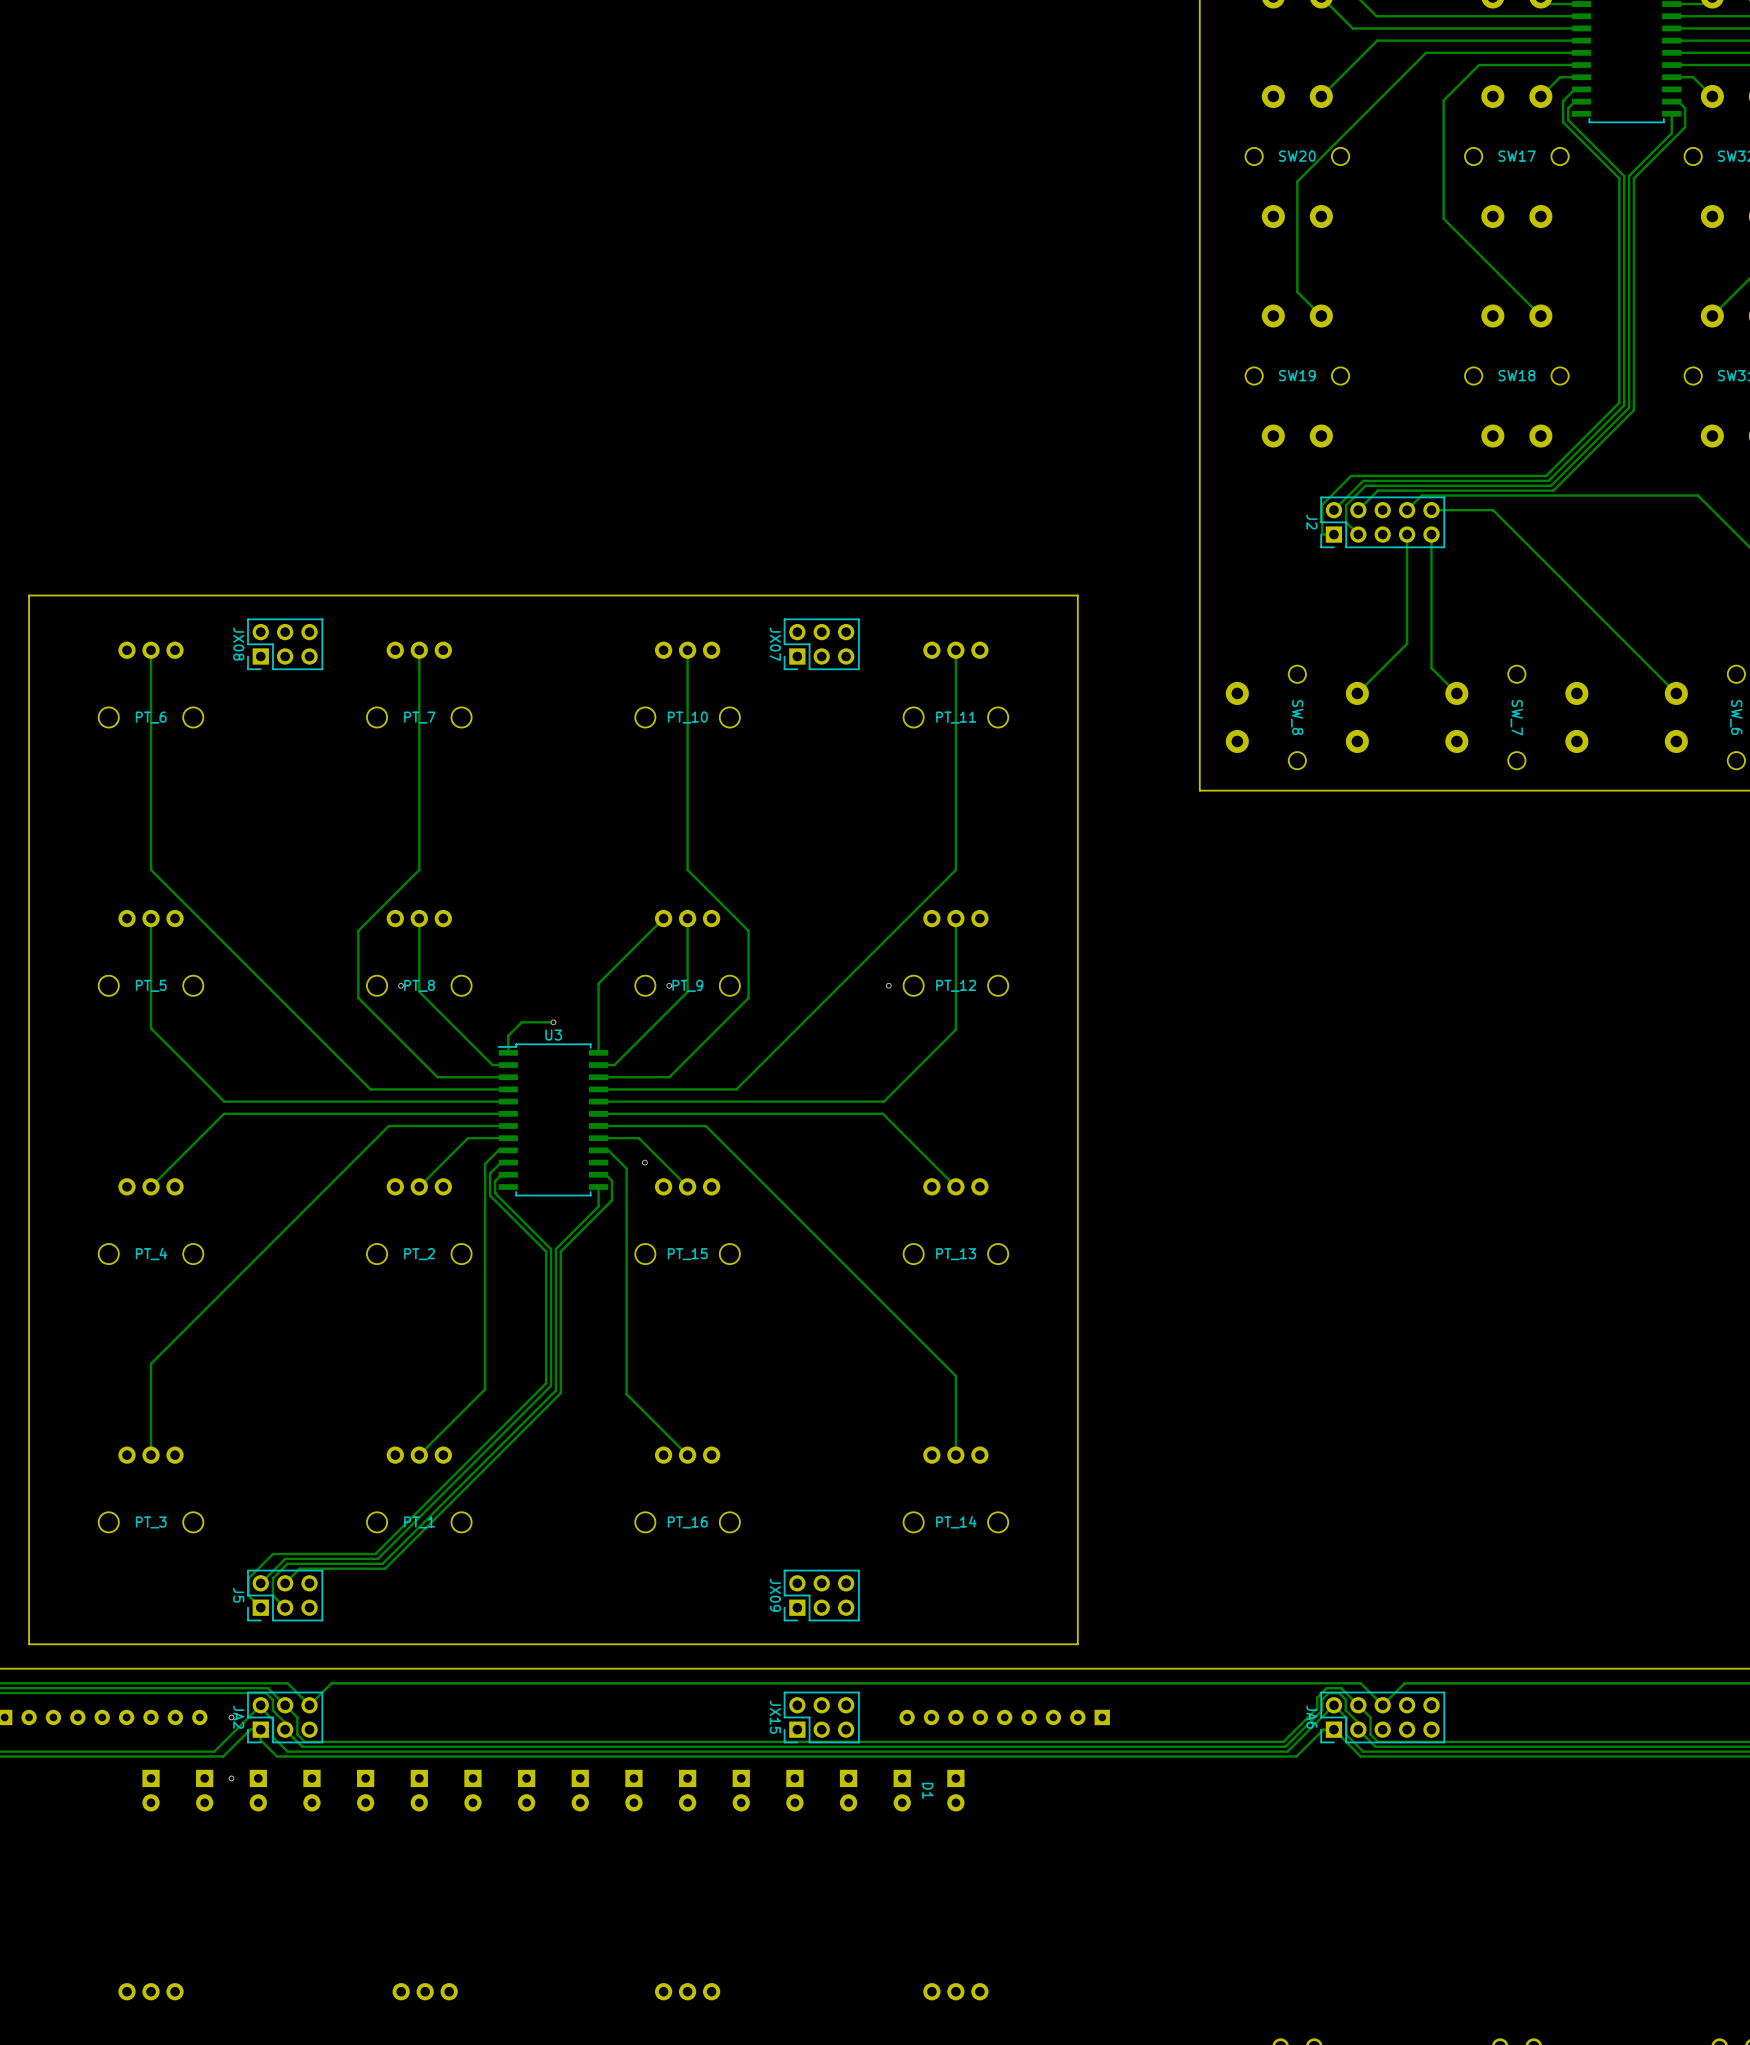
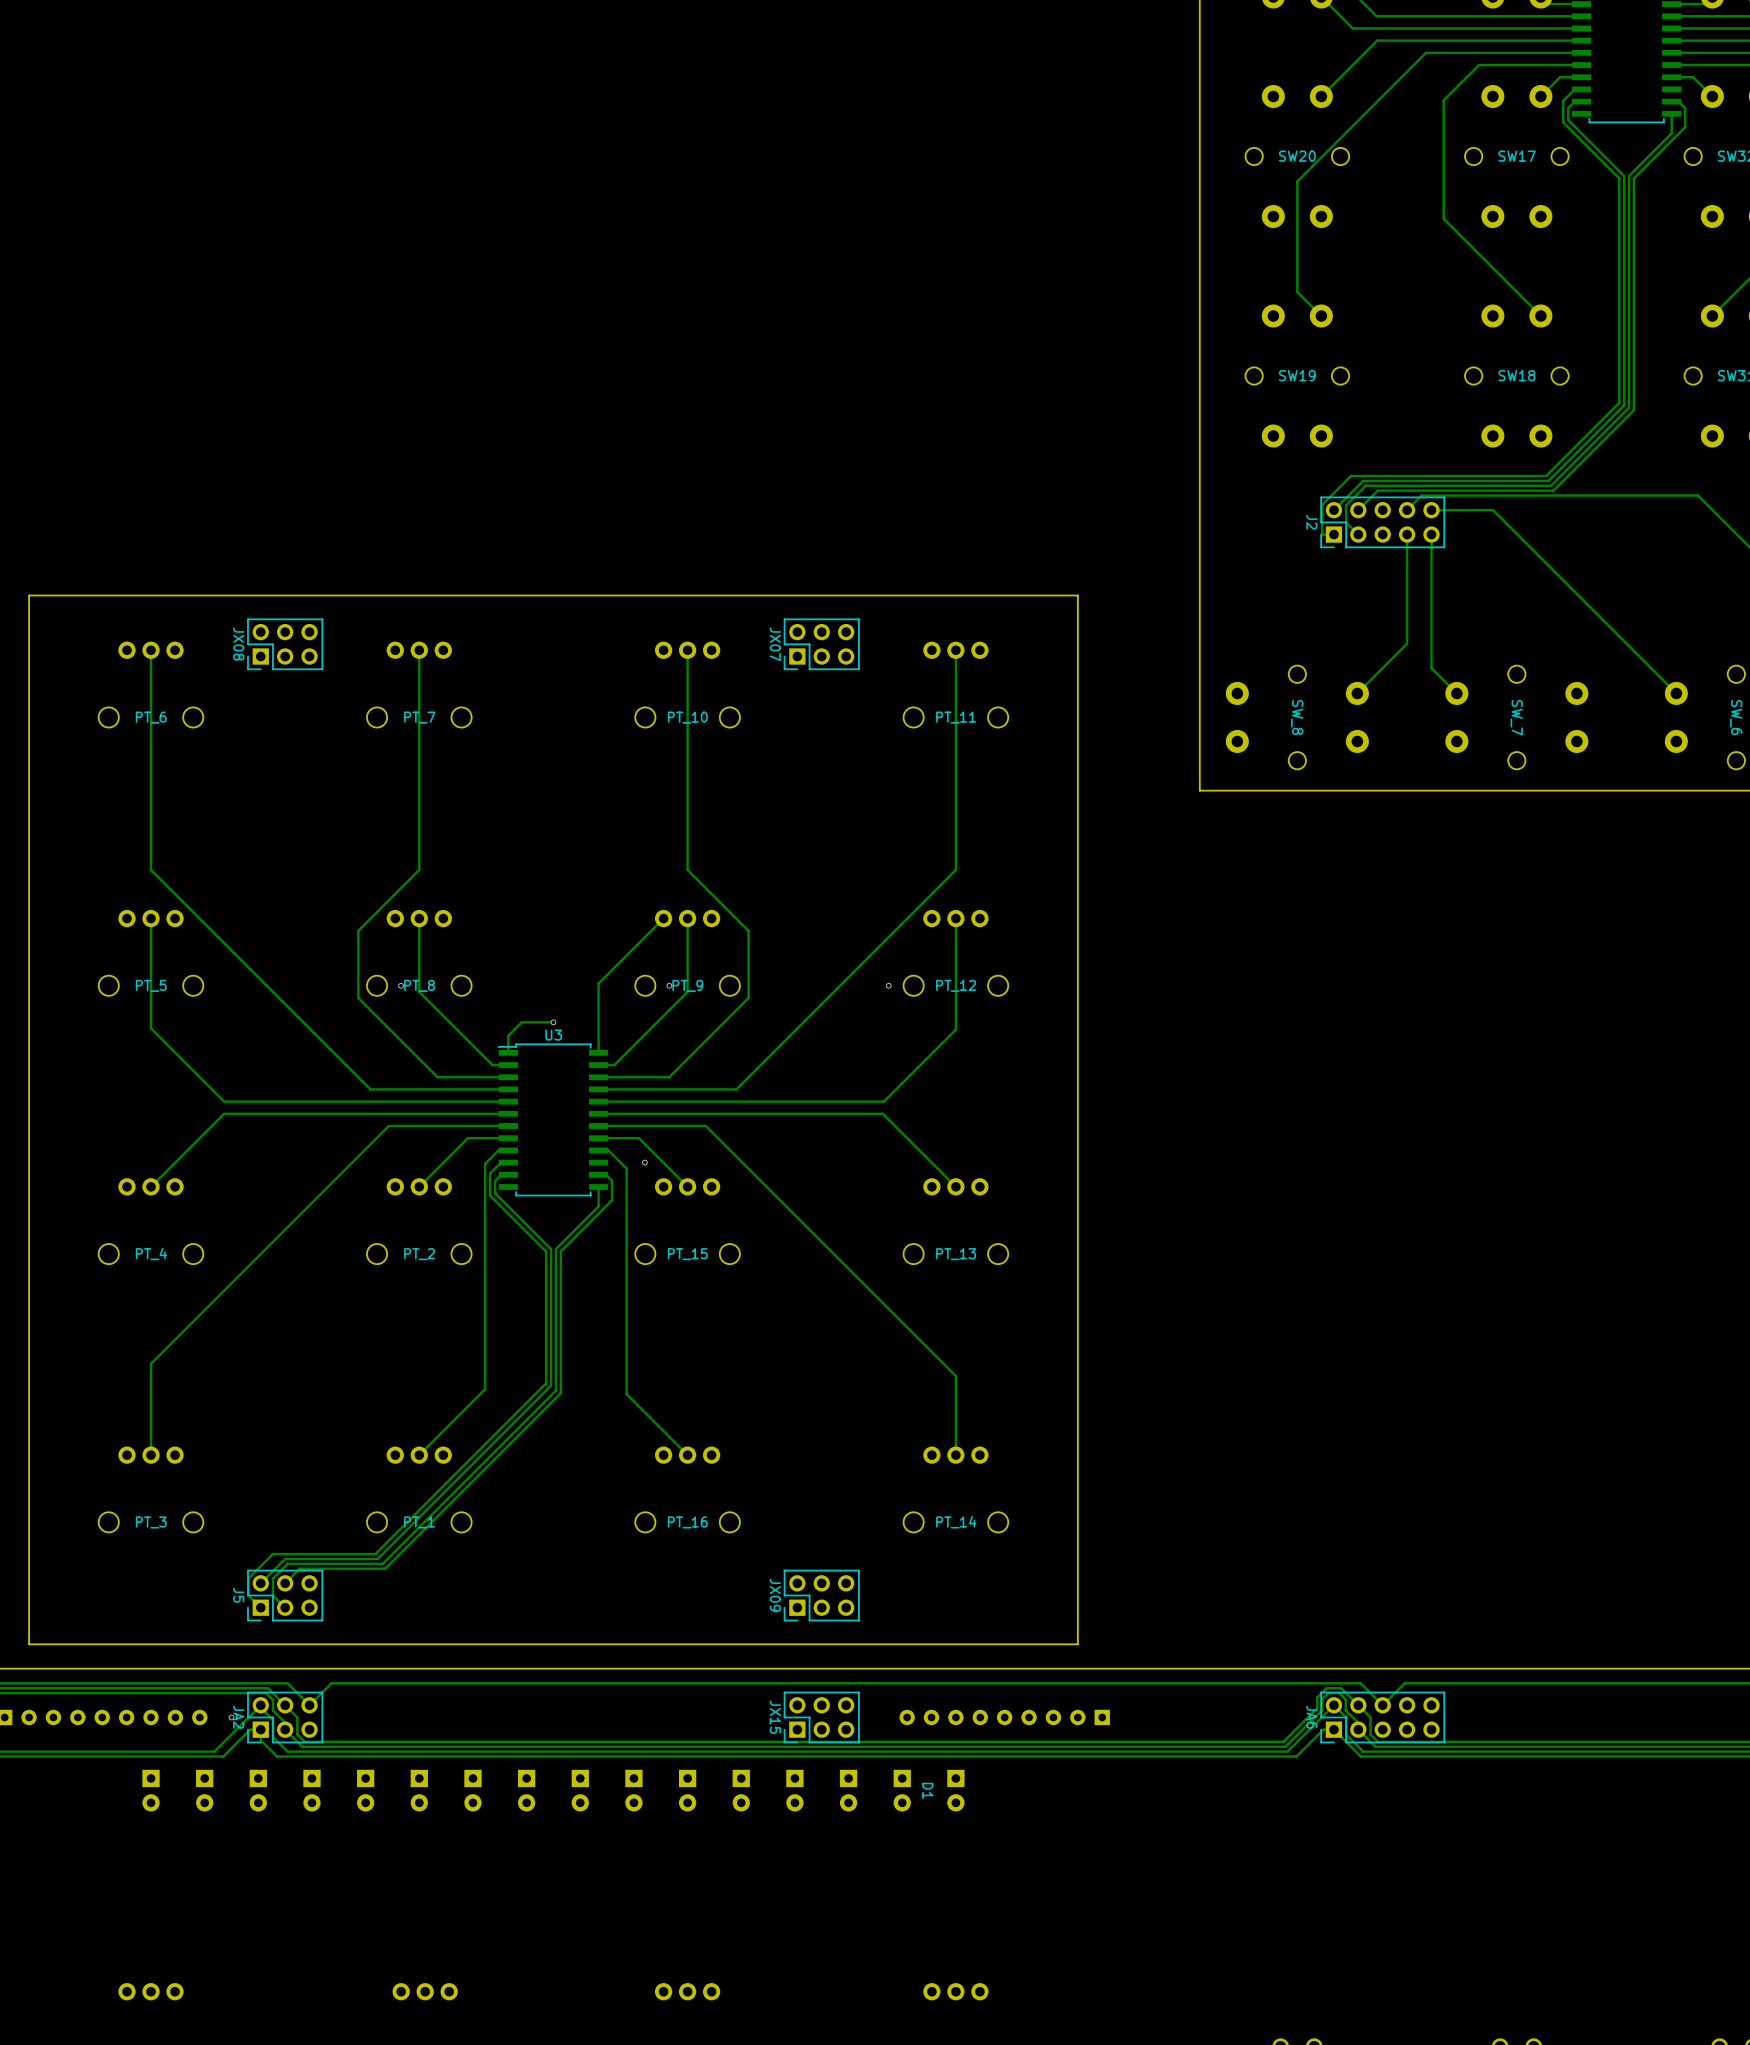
via: (231, 1778) -> none

